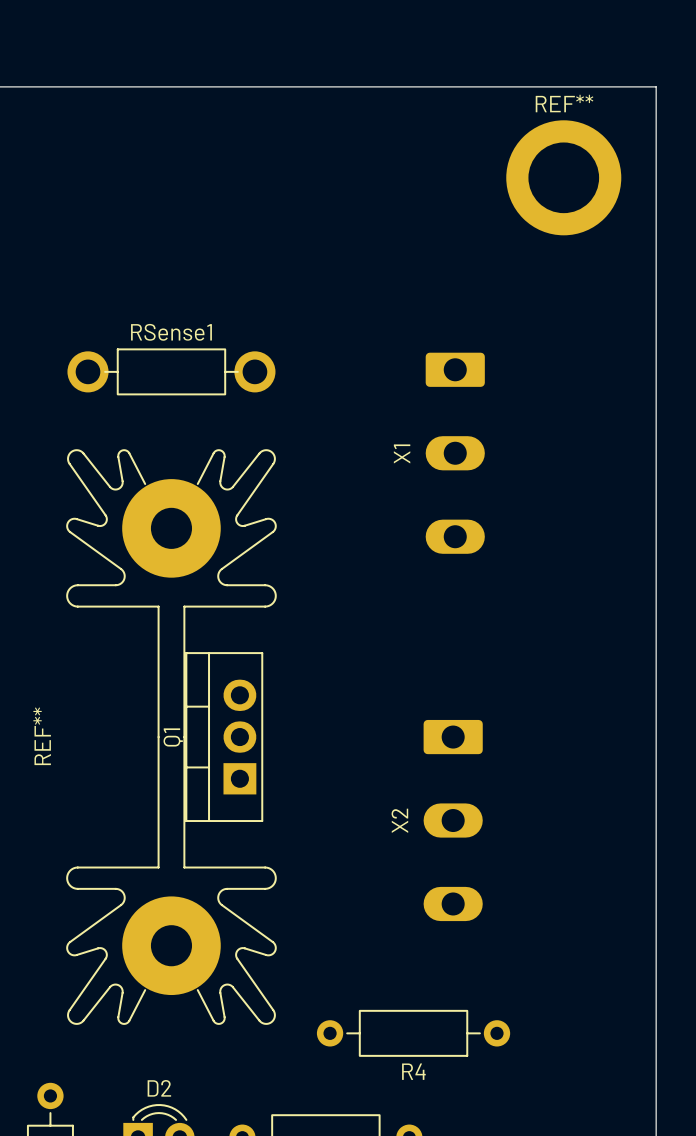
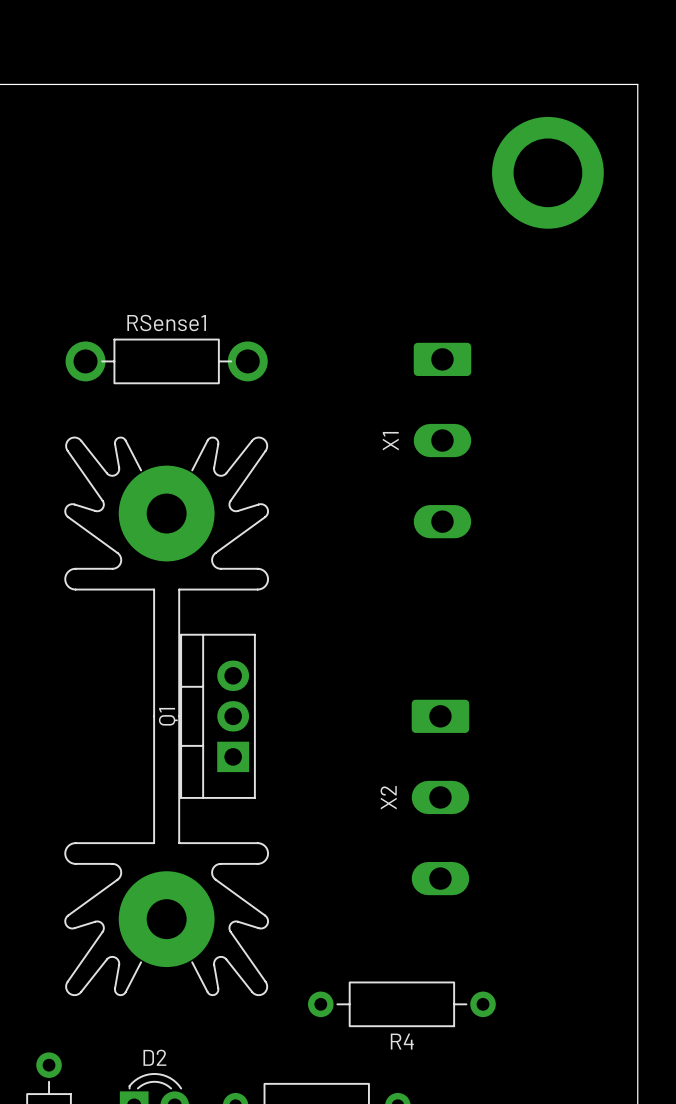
REF** name: REF** (564, 103) -> none
REF** name: REF** (42, 736) -> none

